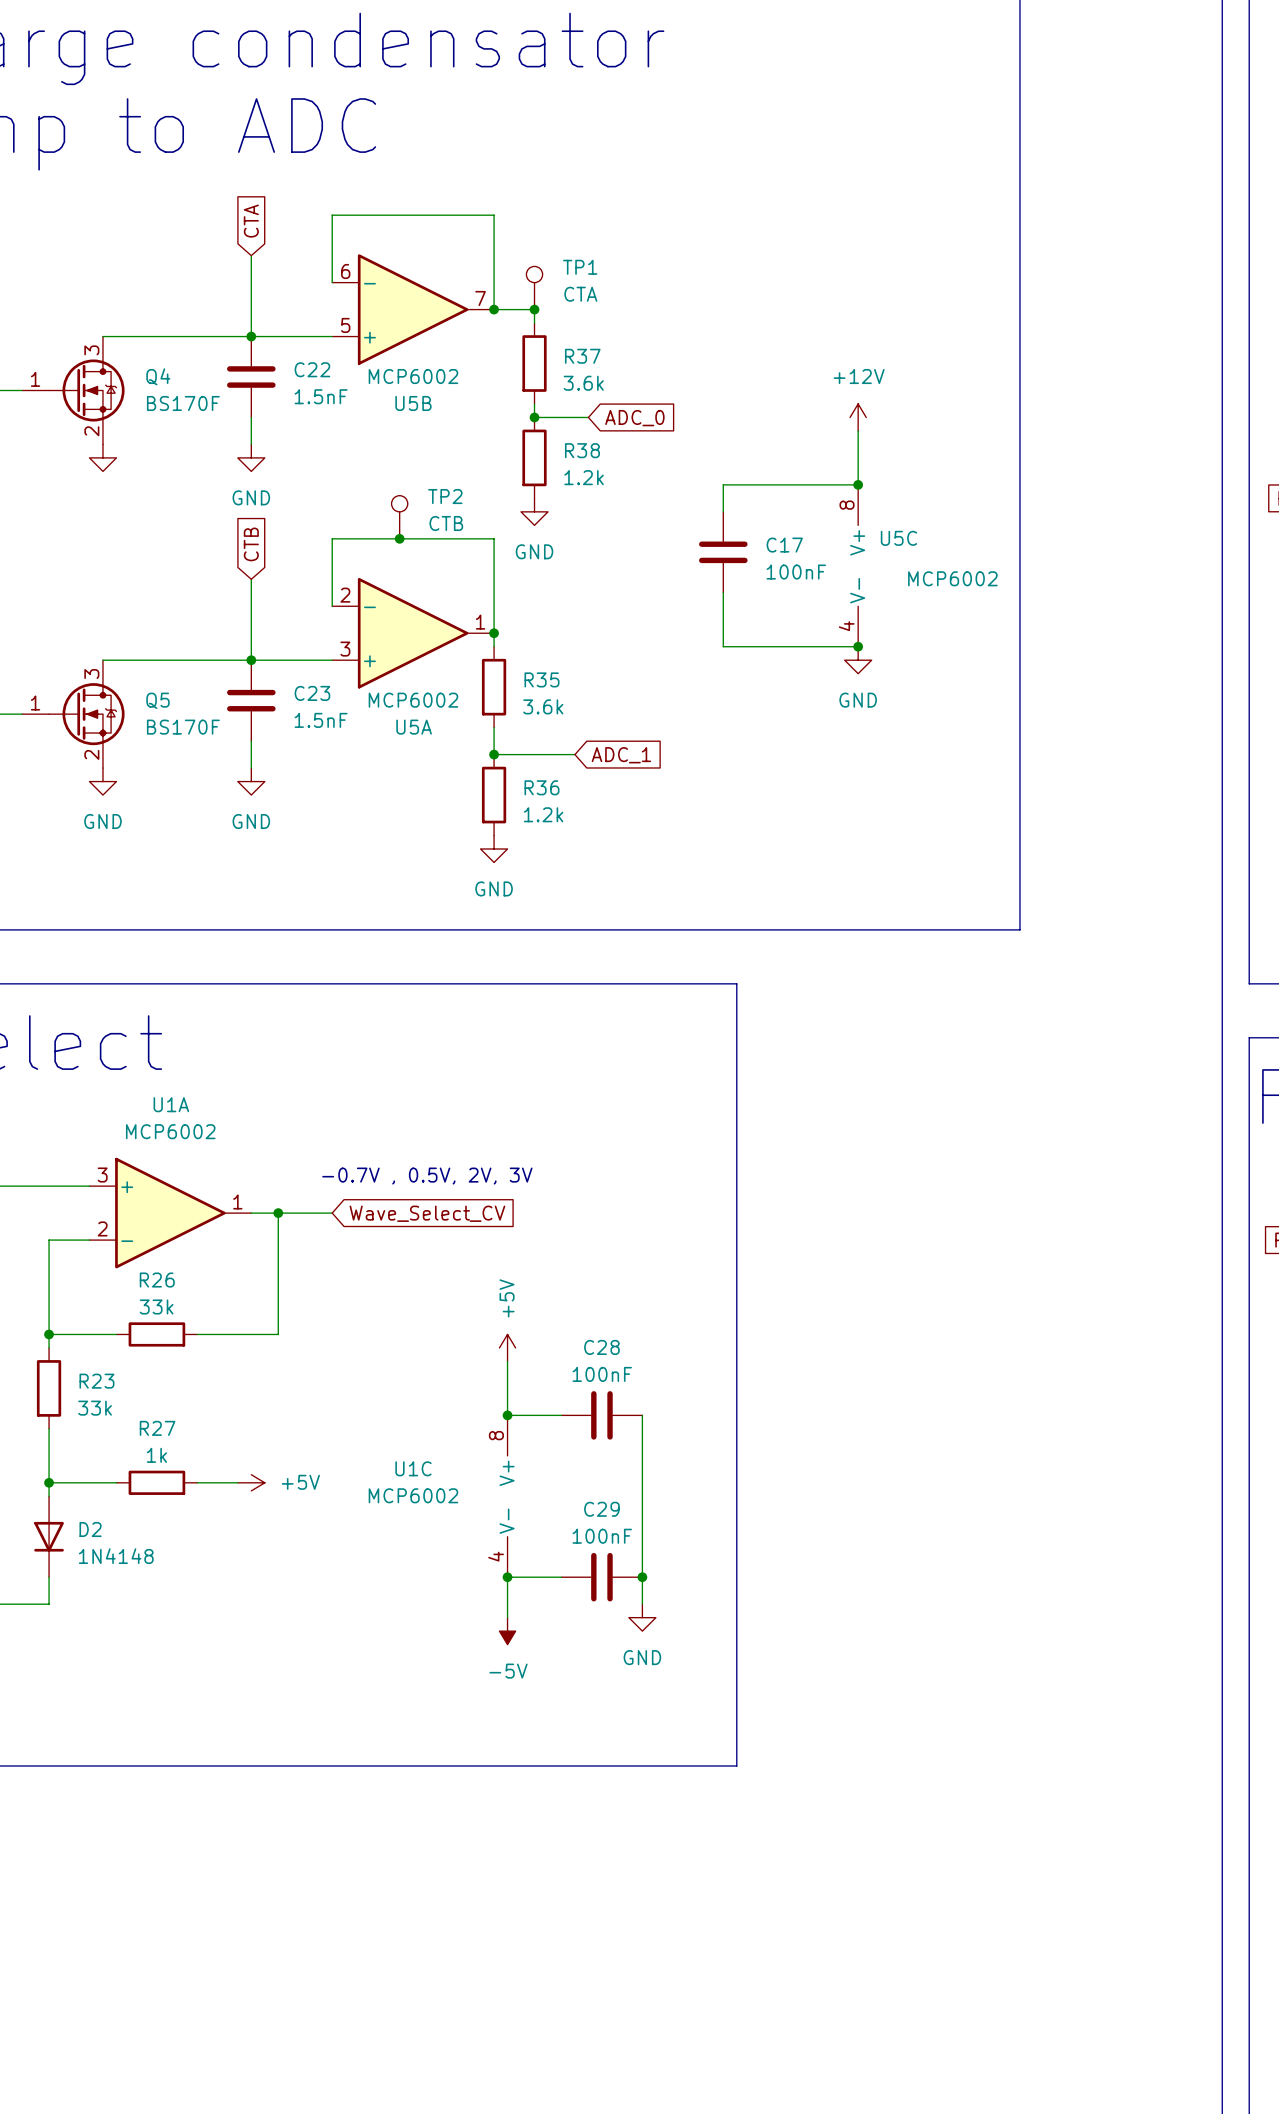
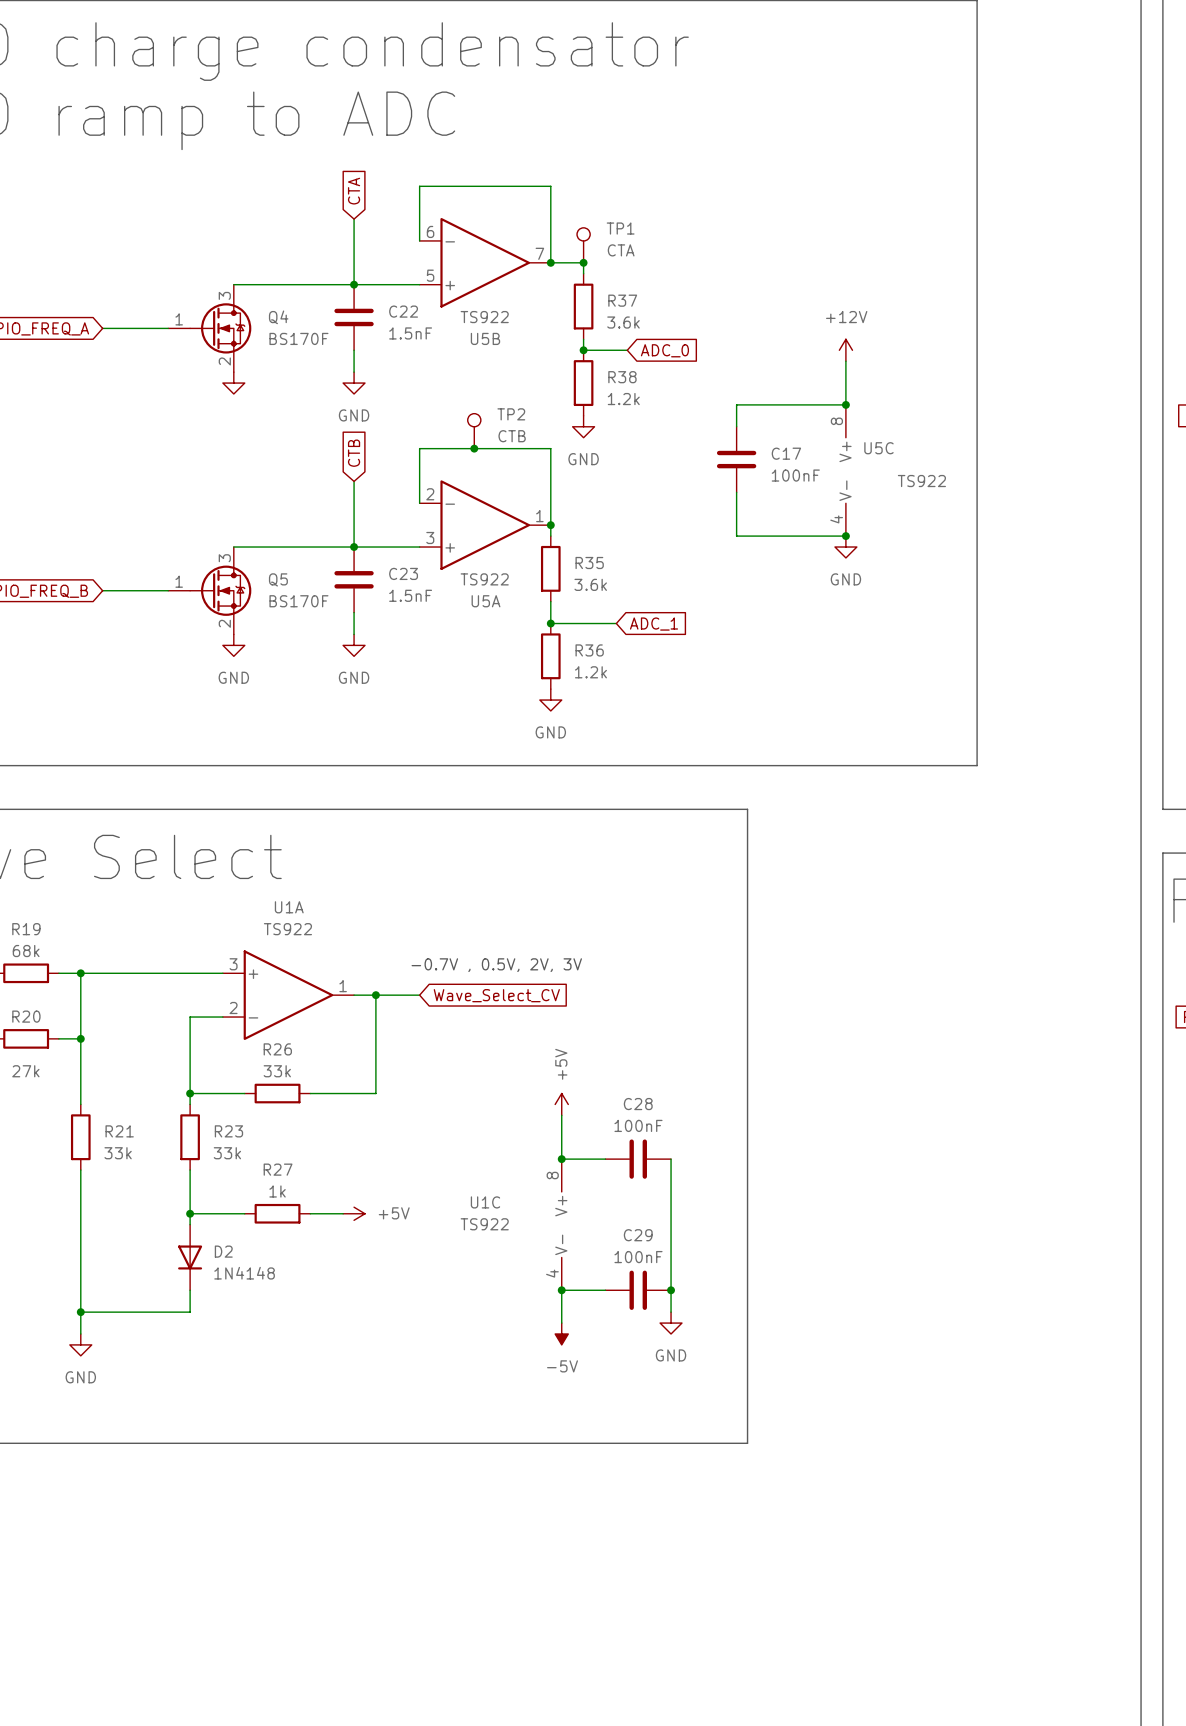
U5B value: MCP6002 (413, 376) -> TS922 (484, 317)
U5C value: MCP6002 (952, 578) -> TS922 (921, 481)
U5A value: MCP6002 (413, 700) -> TS922 (484, 579)
U1A value: MCP6002 (170, 1131) -> TS922 (287, 929)
U1C value: MCP6002 (413, 1495) -> TS922 (484, 1224)

